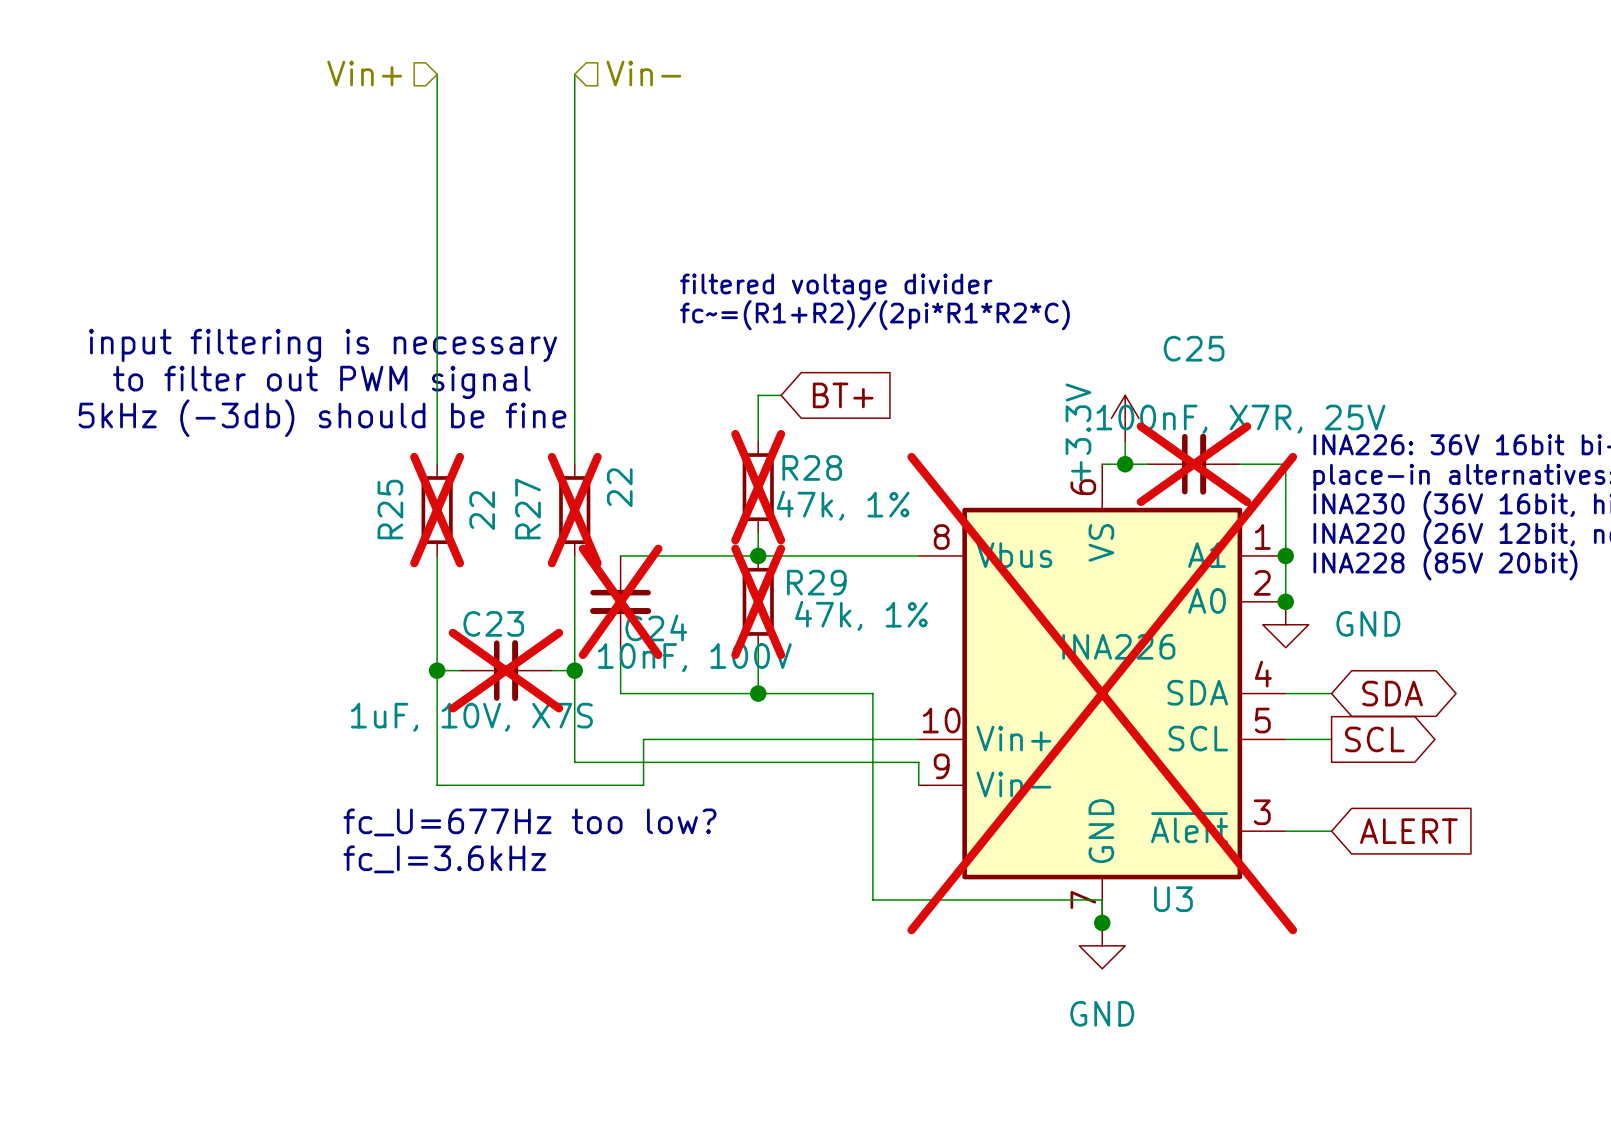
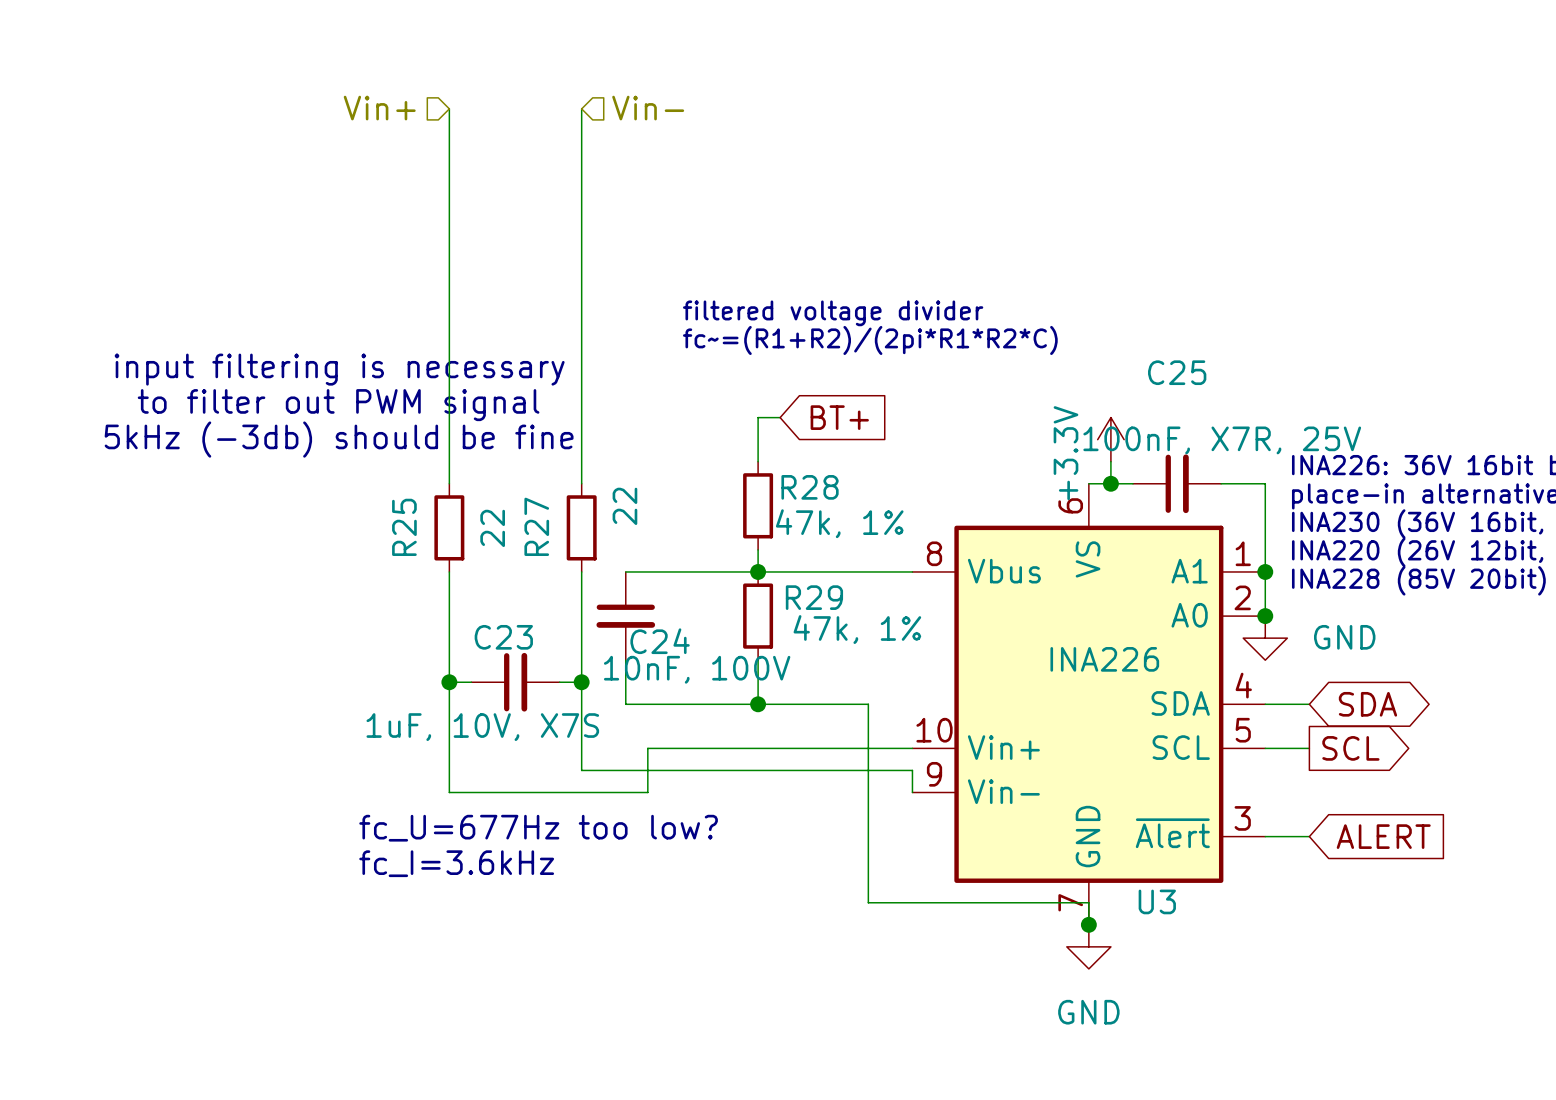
C25 do-not-place cross: (1193, 464) -> none
R28 do-not-place cross: (758, 487) -> none
R25 do-not-place cross: (437, 510) -> none
R27 do-not-place cross: (574, 510) -> none
C24 do-not-place cross: (620, 601) -> none
R29 do-not-place cross: (758, 601) -> none
C23 do-not-place cross: (505, 670) -> none
U3 do-not-place cross: (1102, 693) -> none

